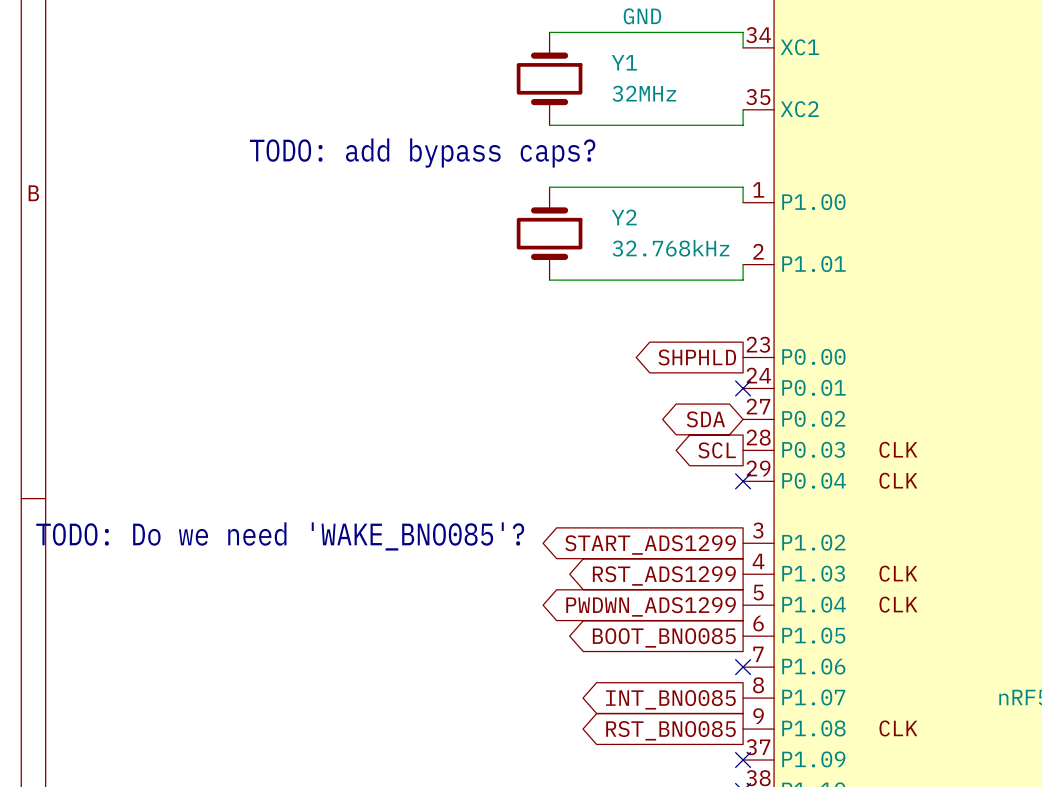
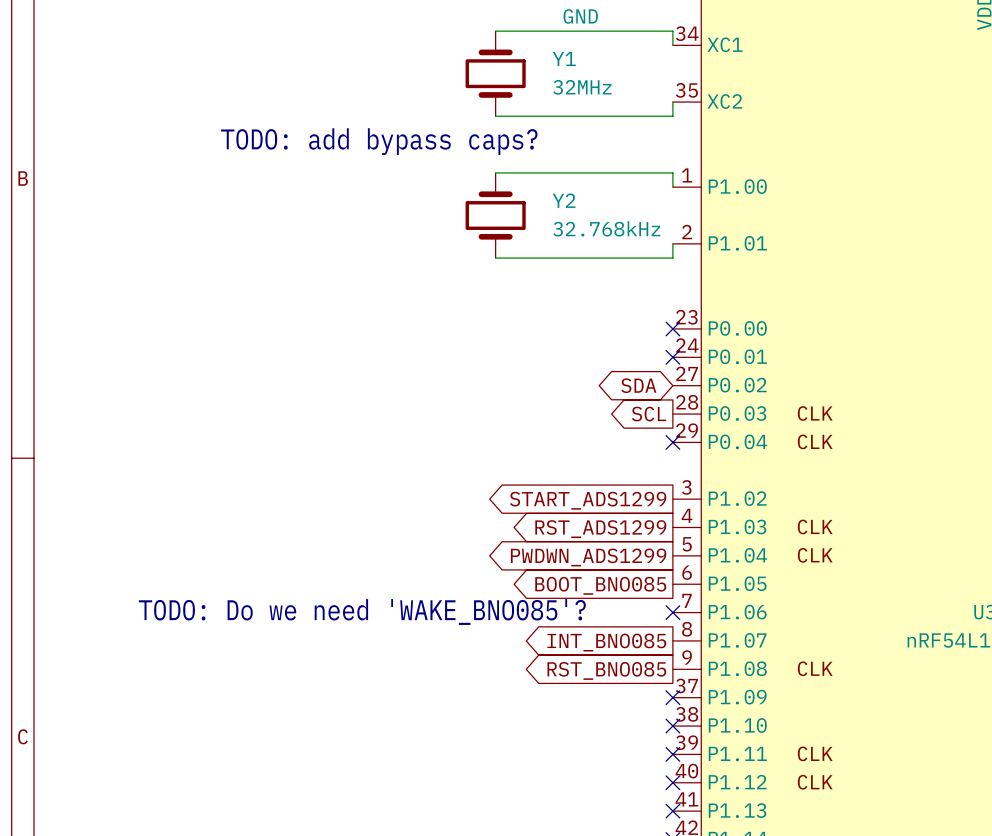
global label: SHPHLD (697, 357) -> none
no-connect mark: none -> (672, 328)
text position: TODO: Do we need 'WAKE_BNO085'? (280, 536) -> TODO: Do we need 'WAKE_BNO085'? (362, 612)

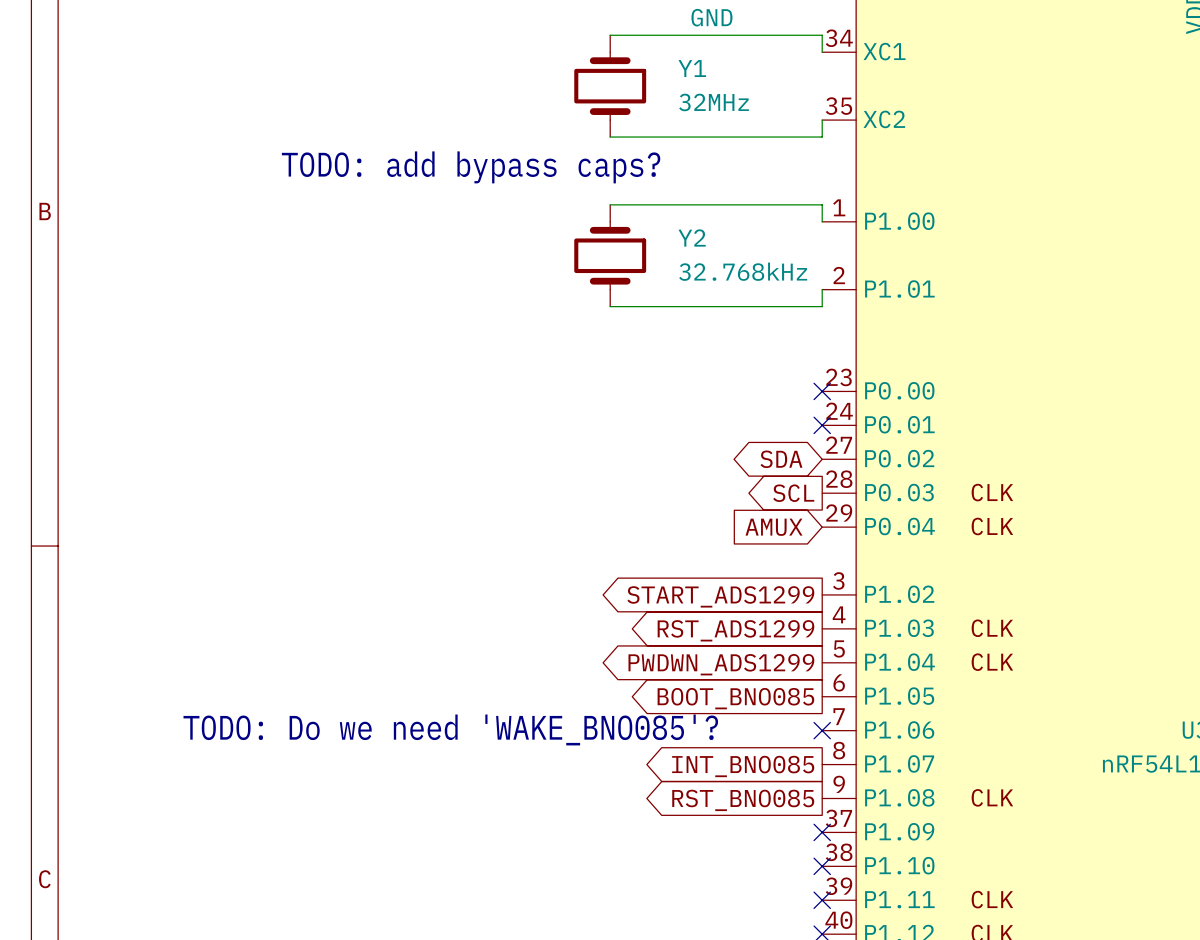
global label: none -> AMUX (774, 527)
no-connect mark: (672, 442) -> none

